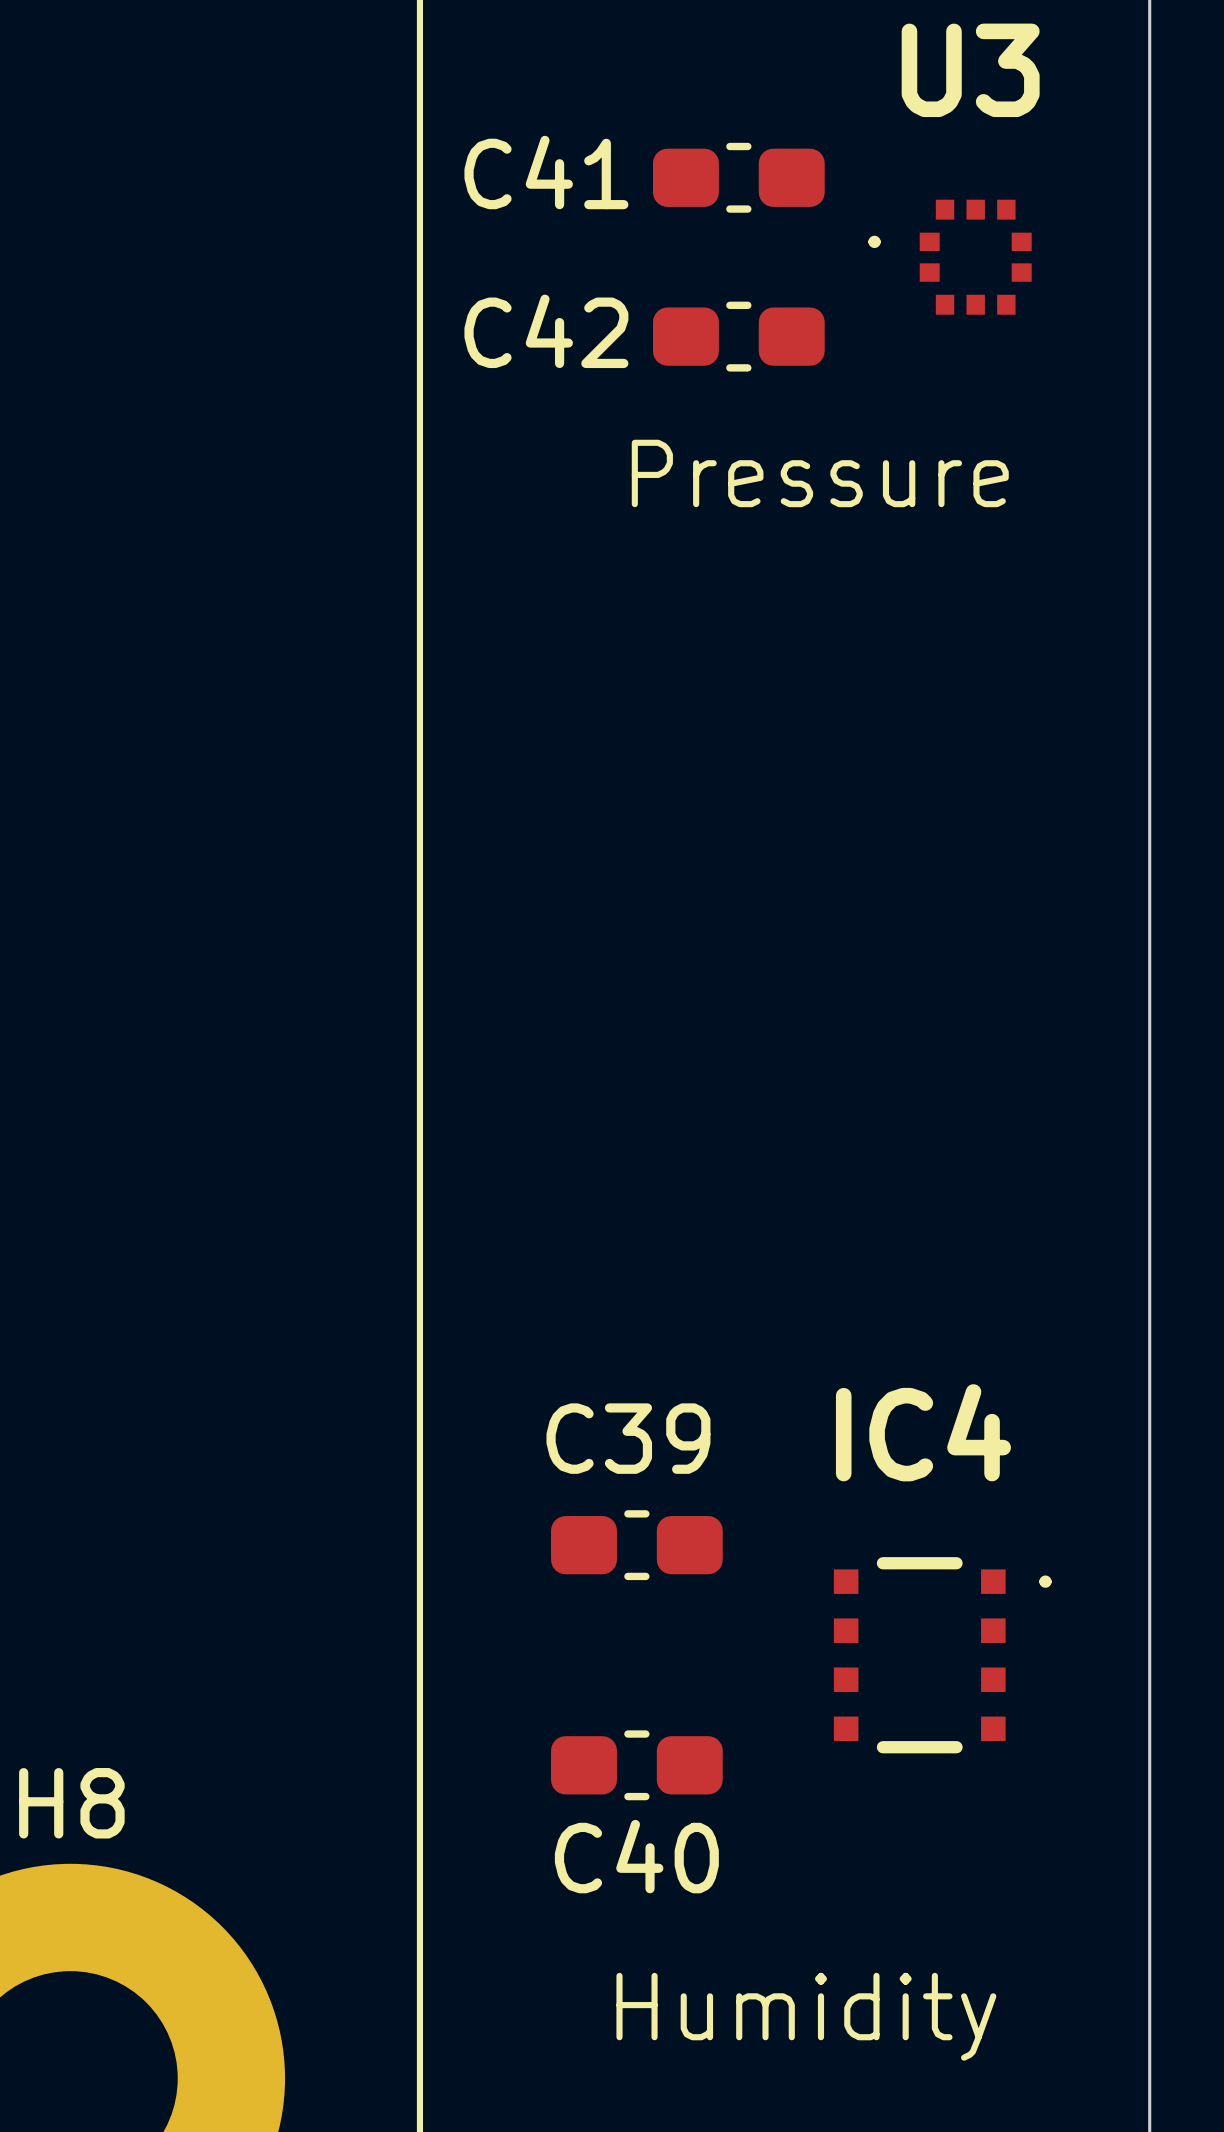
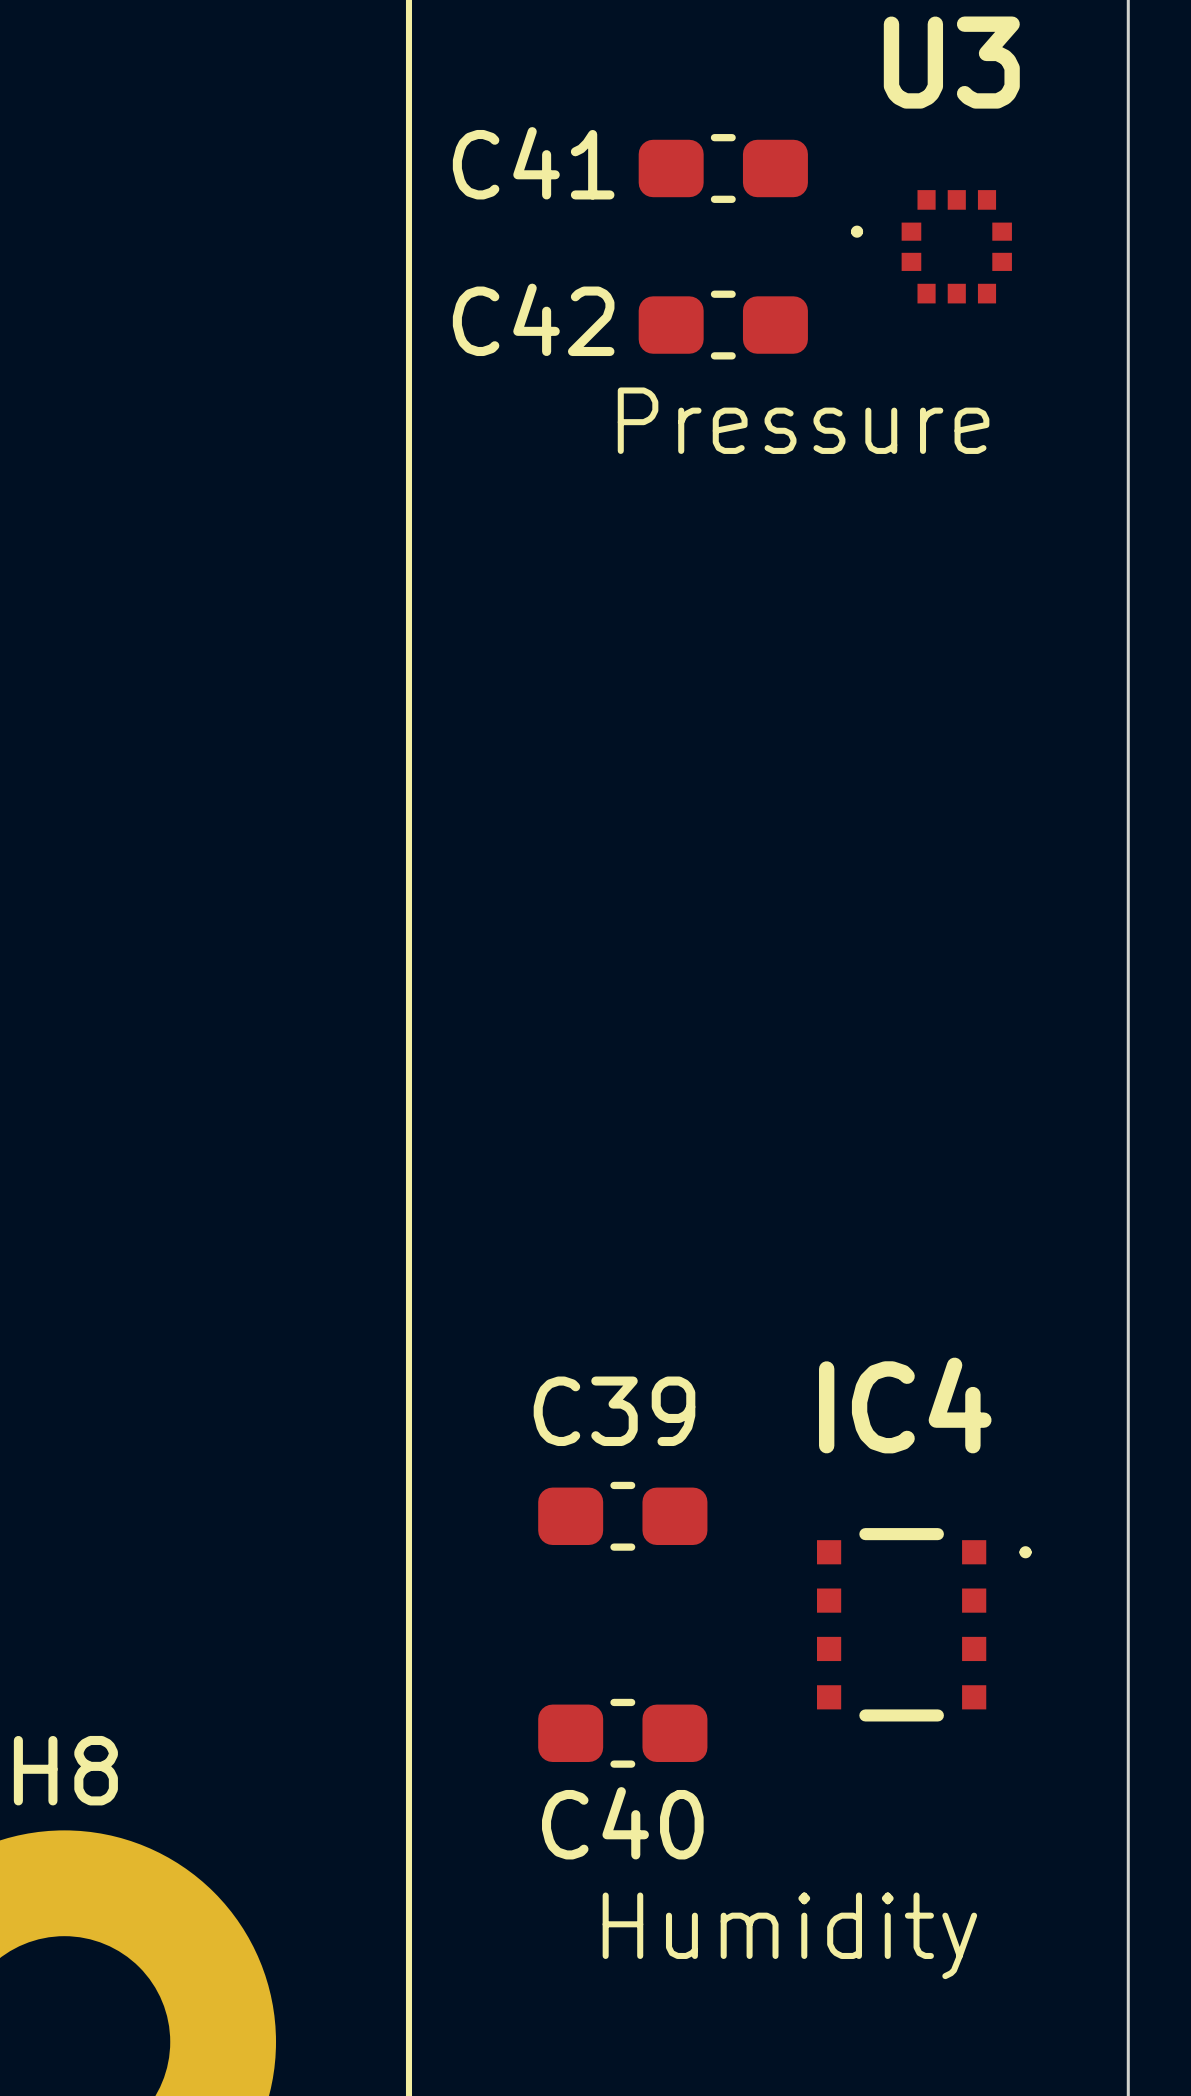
text position: Pressure (820, 473) -> Pressure (803, 420)
text position: Humidity (806, 2016) -> Humidity (789, 1935)

